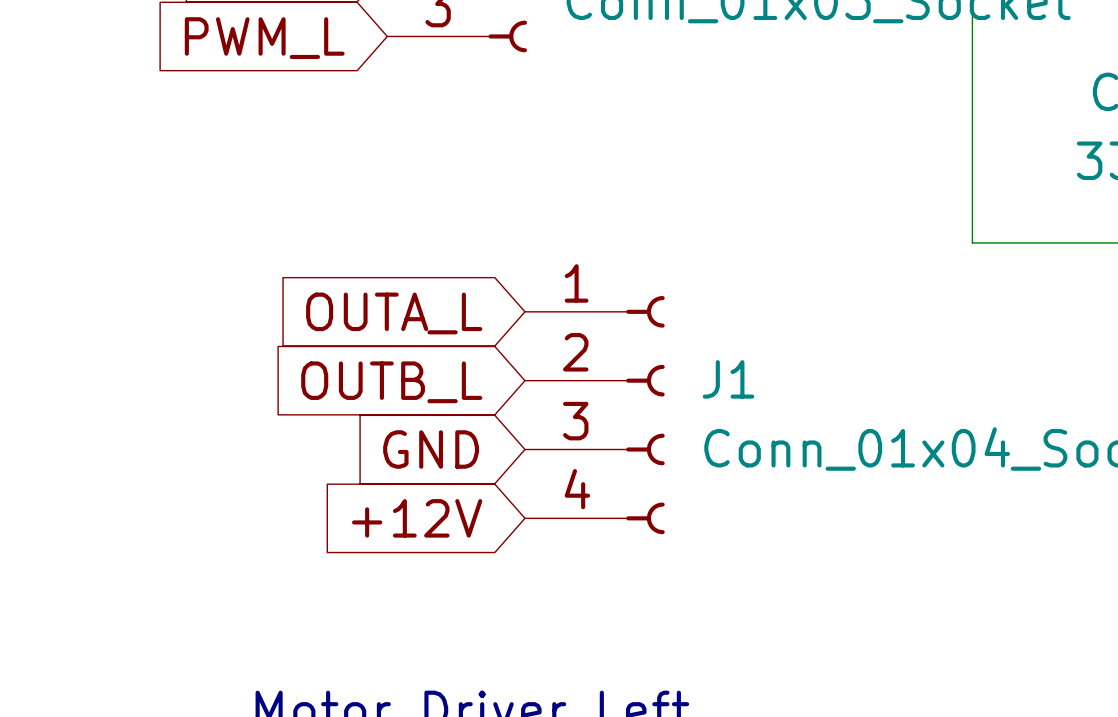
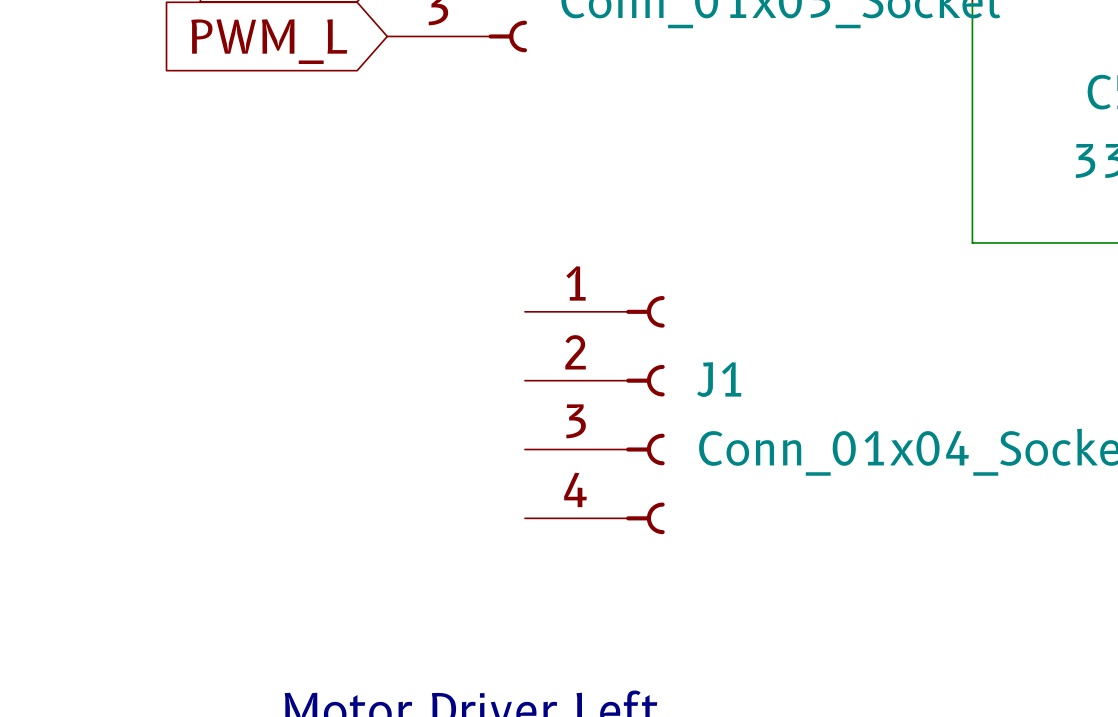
global label: OUTA_L (394, 313) -> none
global label: OUTB_L (391, 382) -> none
global label: GND (431, 449) -> none
global label: +12V (417, 518) -> none

